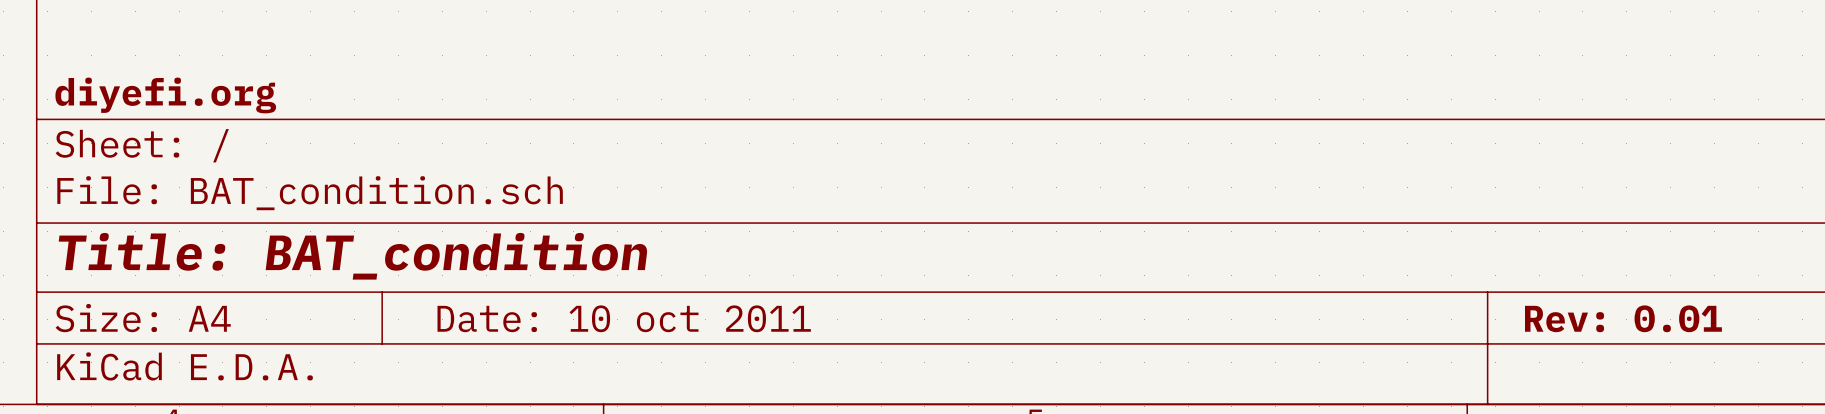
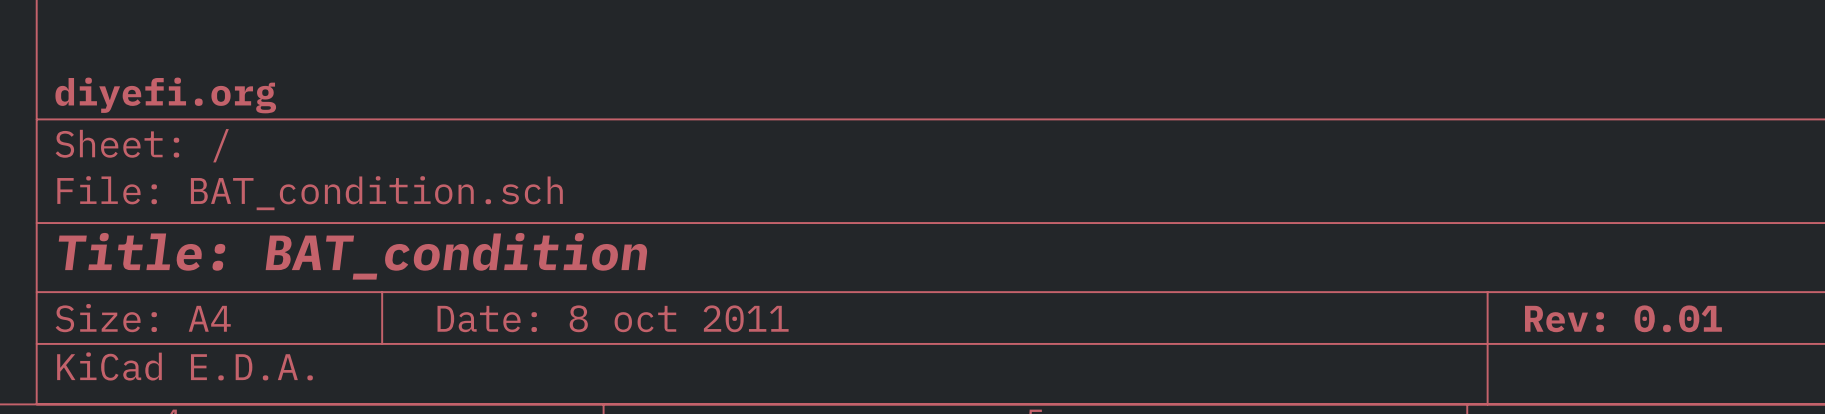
title block: Date: 10 oct 2011 (624, 318) -> Date: 8 oct 2011 (613, 318)

